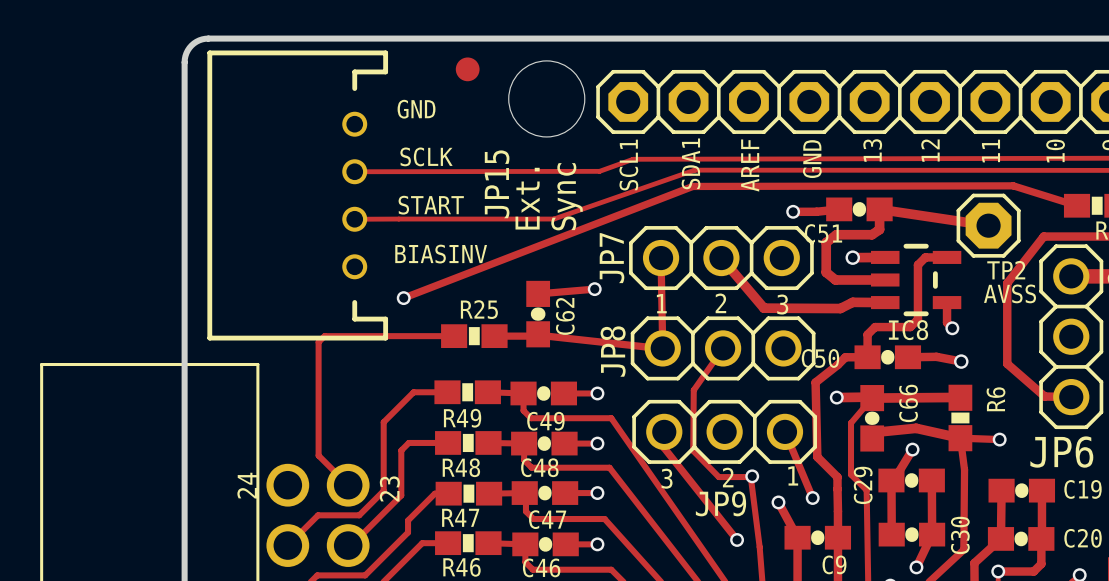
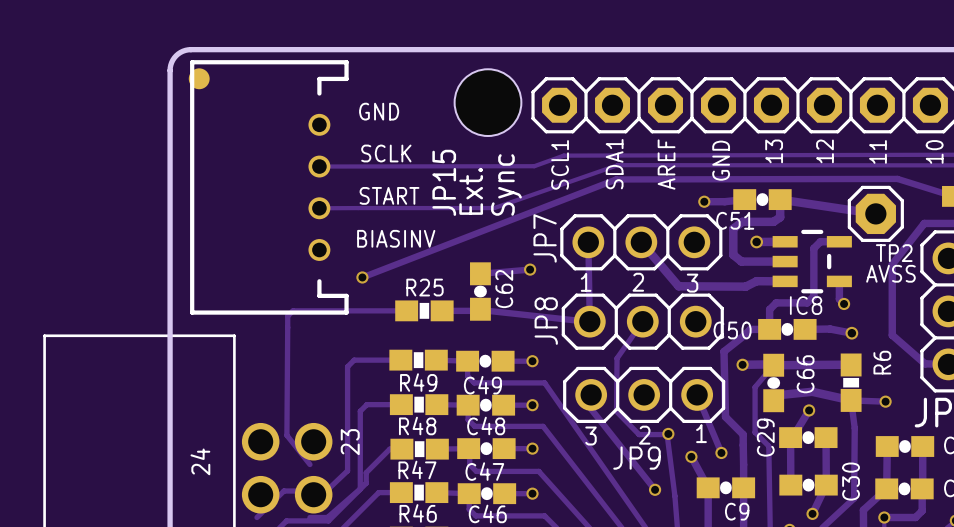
part position: (467, 69) -> (199, 78)
track: (318, 355) (318, 455) (348, 485) -> (287, 327) (286, 435) (309, 464)
track: (413, 392) (383, 422) (383, 490) (359, 515) (318, 515) (287, 545) -> (371, 360) (354, 360) (347, 366) (347, 470) (326, 491) (284, 491) (256, 517)
text position: 24 (247, 485) -> 24 (200, 461)
track: (401, 495) (351, 545) (348, 545) -> (360, 450) (360, 488) (327, 517) (309, 517)

